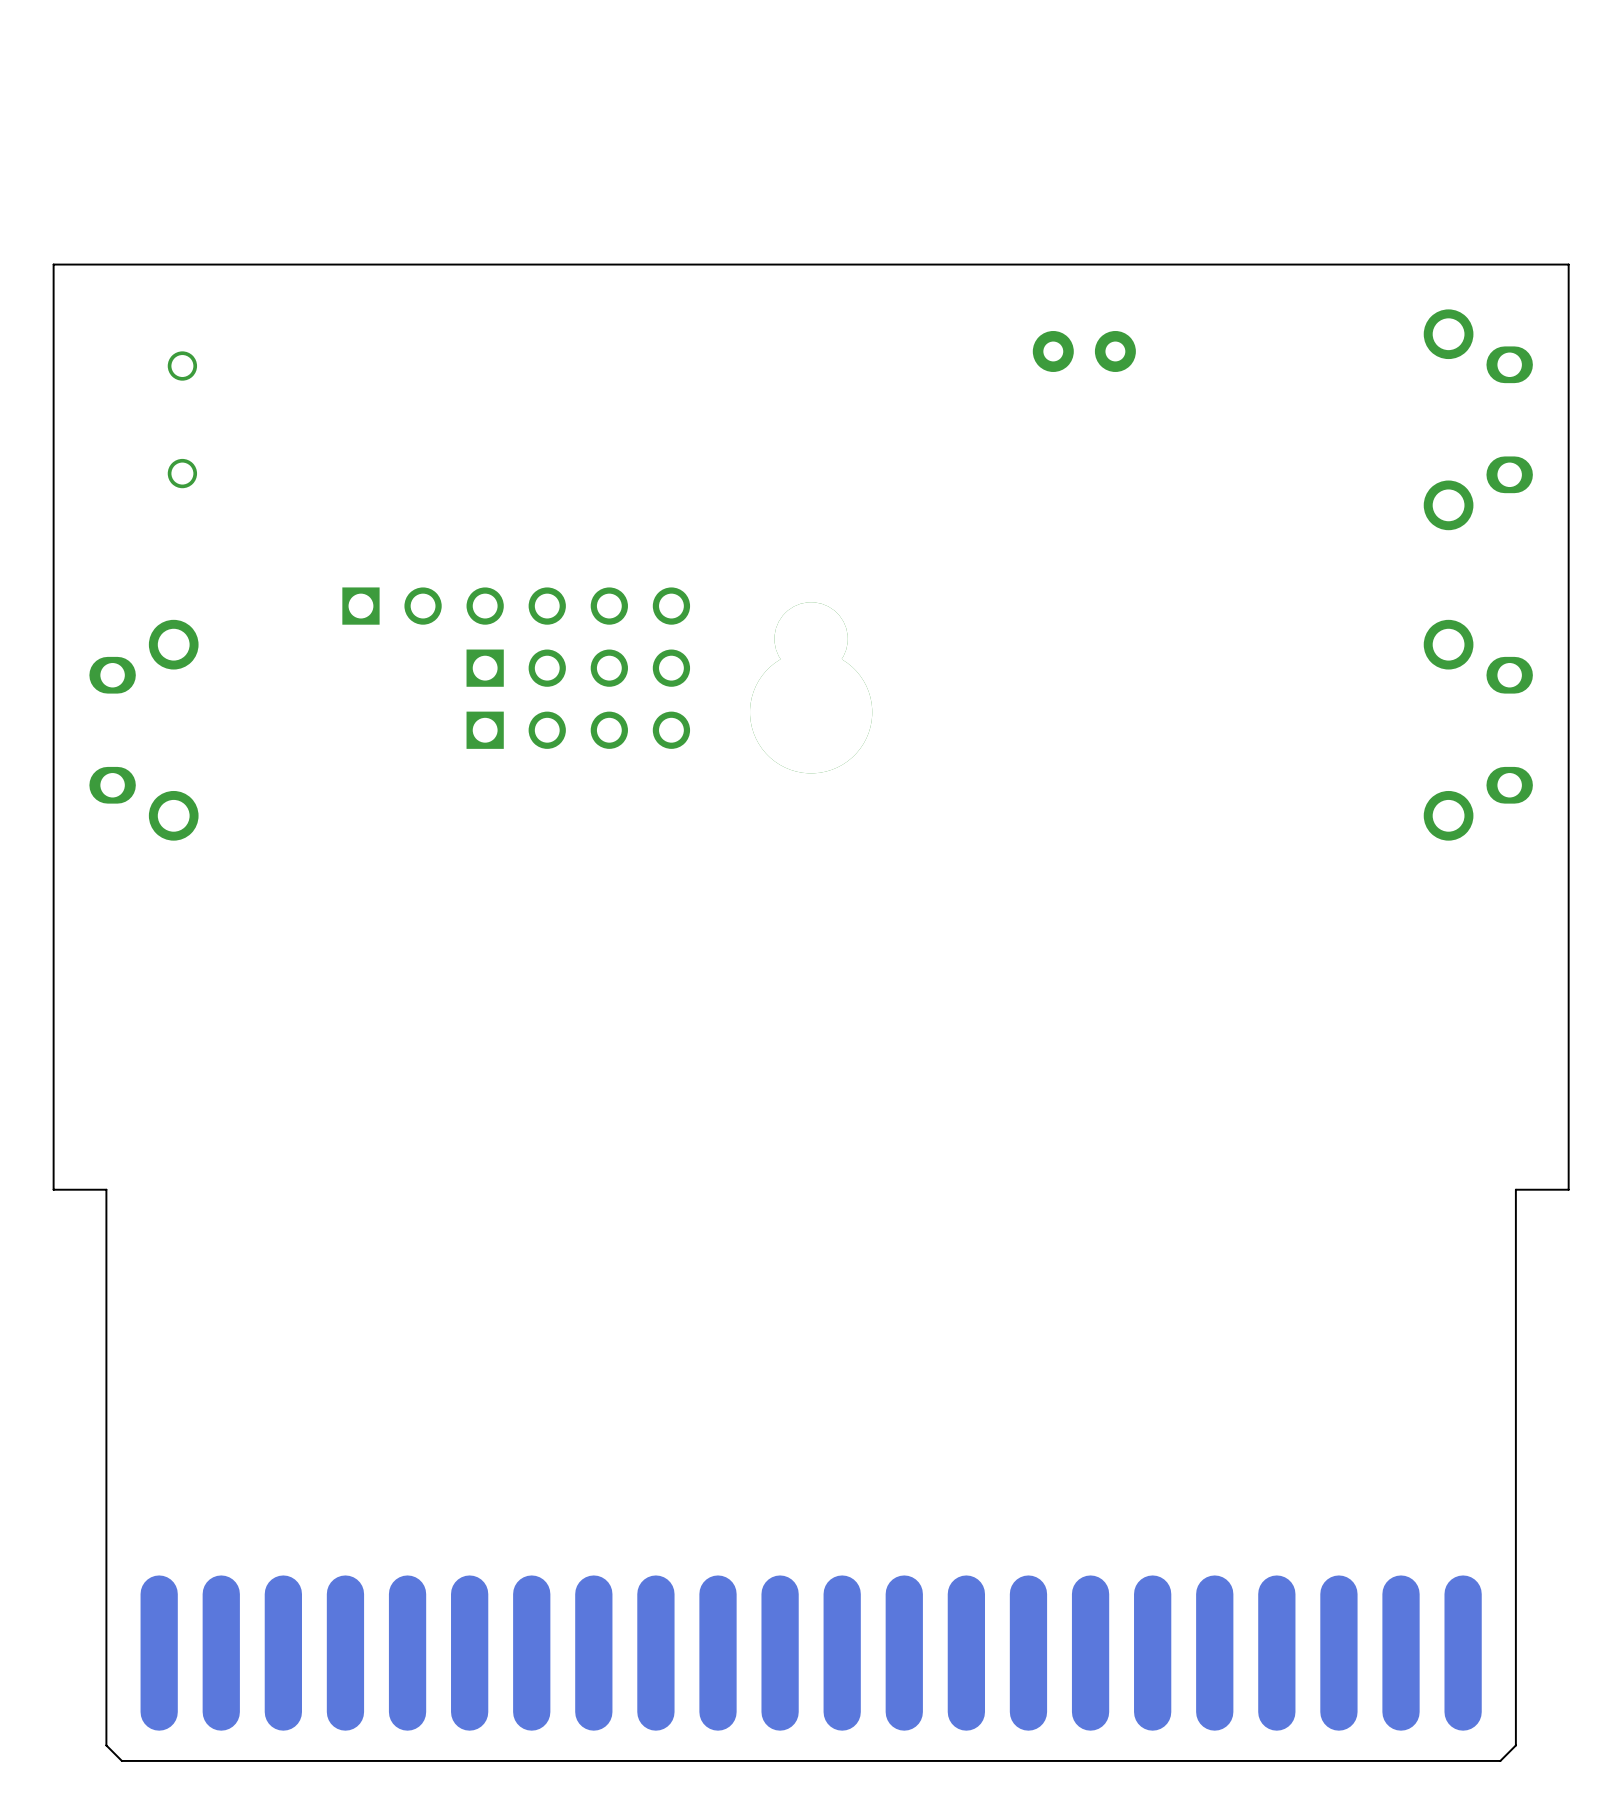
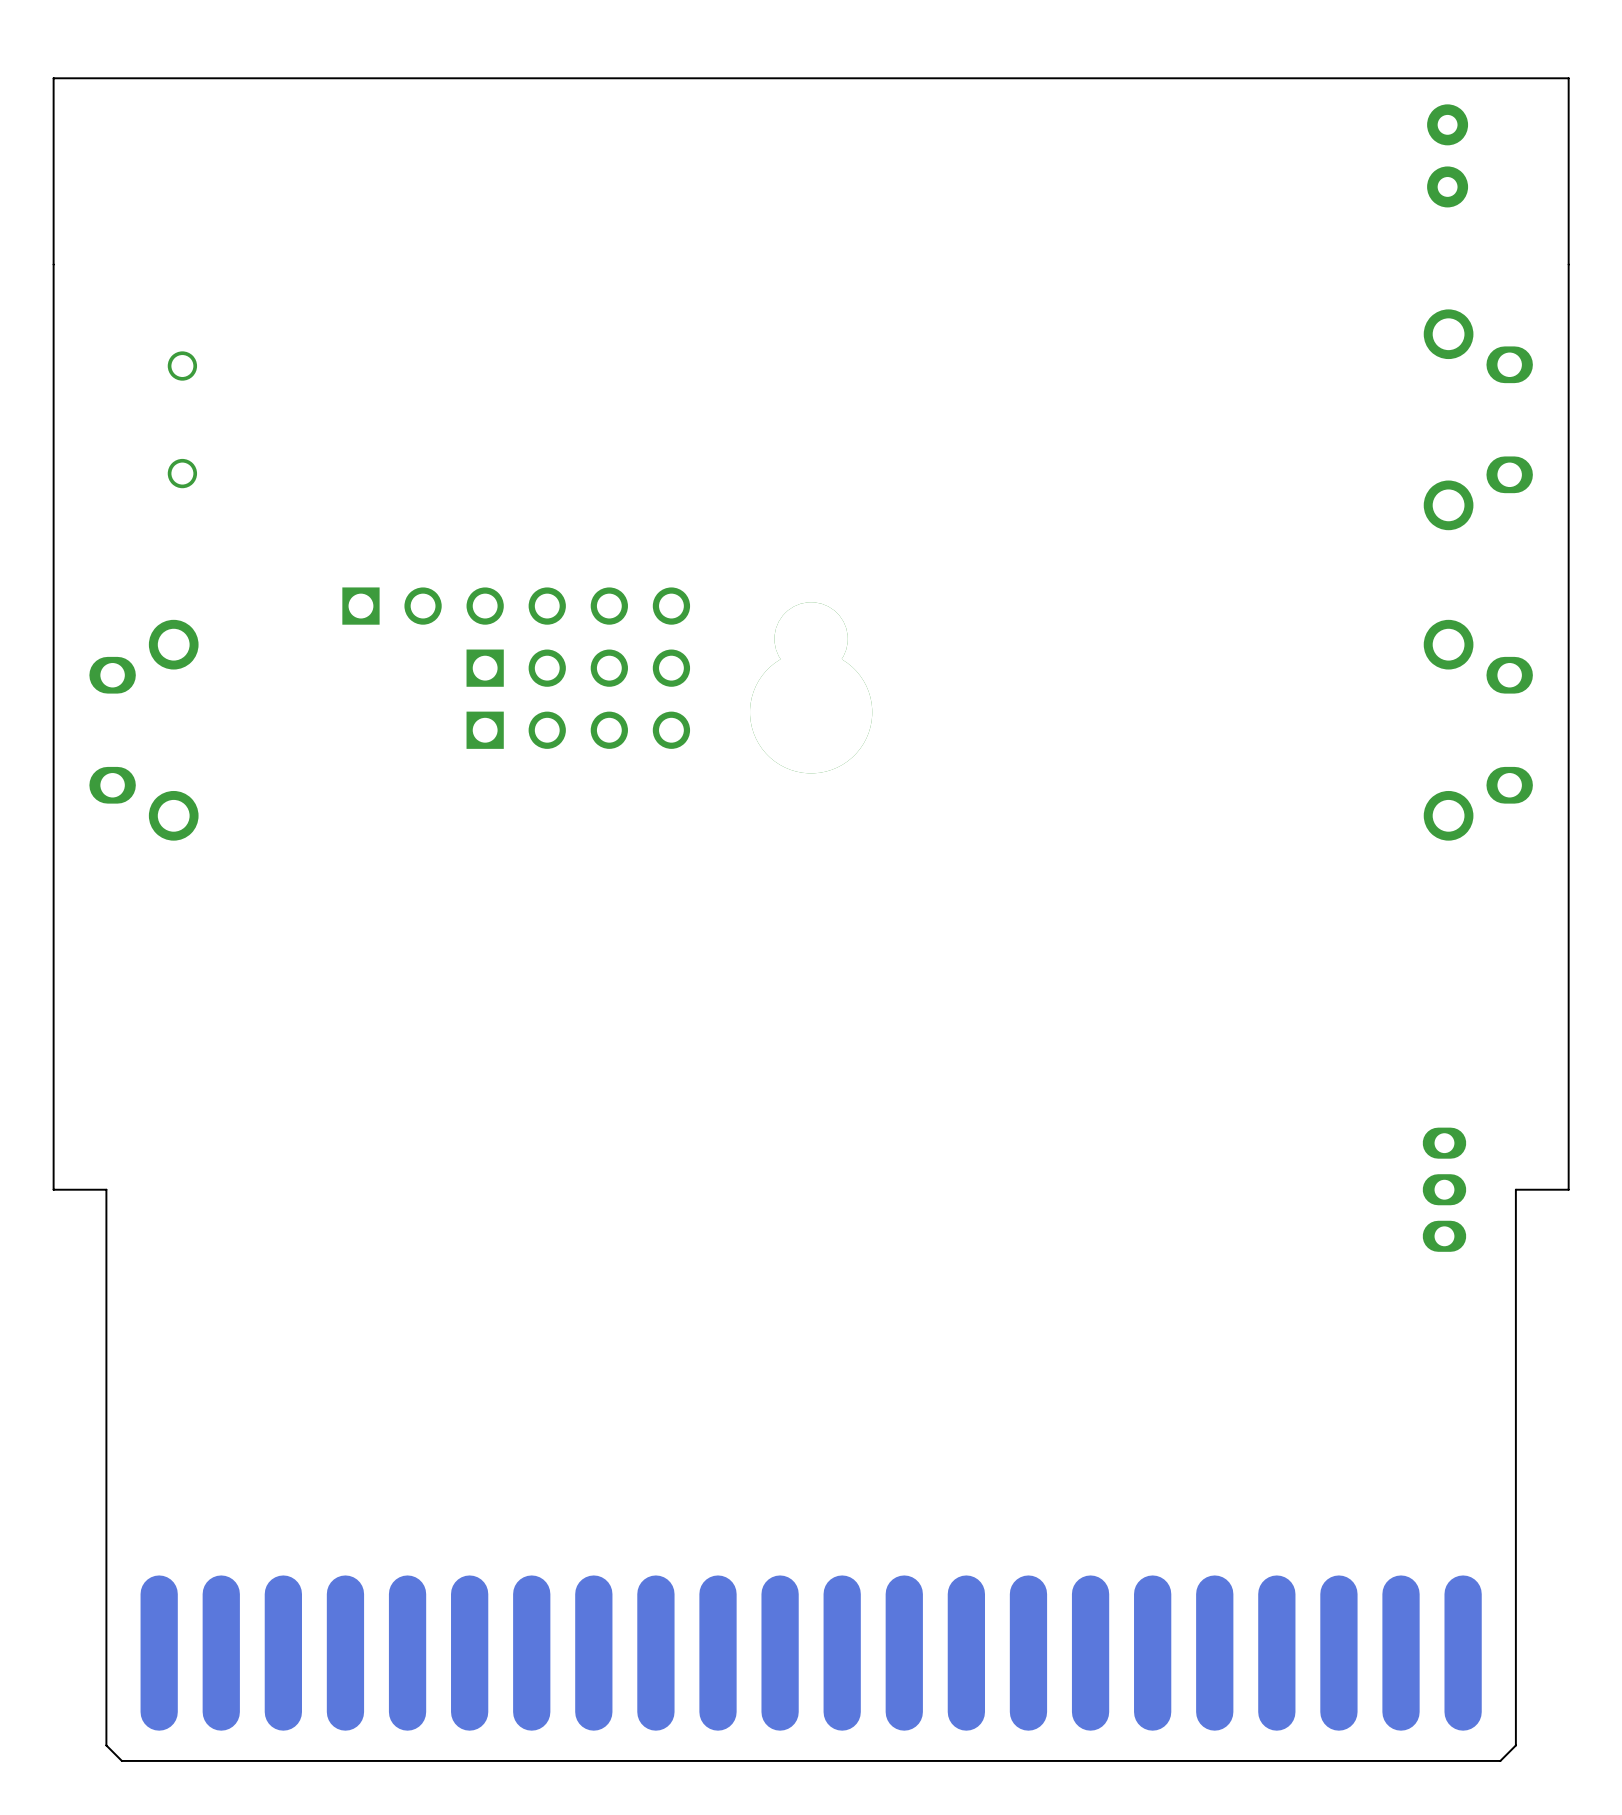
board edge: (1568, 264) (53, 264) -> (1568, 264) (1568, 78) (53, 78) (53, 264)
part rotation: 0° (1084, 351) -> 90° clockwise (1447, 155)
part position: (1084, 351) -> (1447, 155)
part: none -> (1444, 1189)

